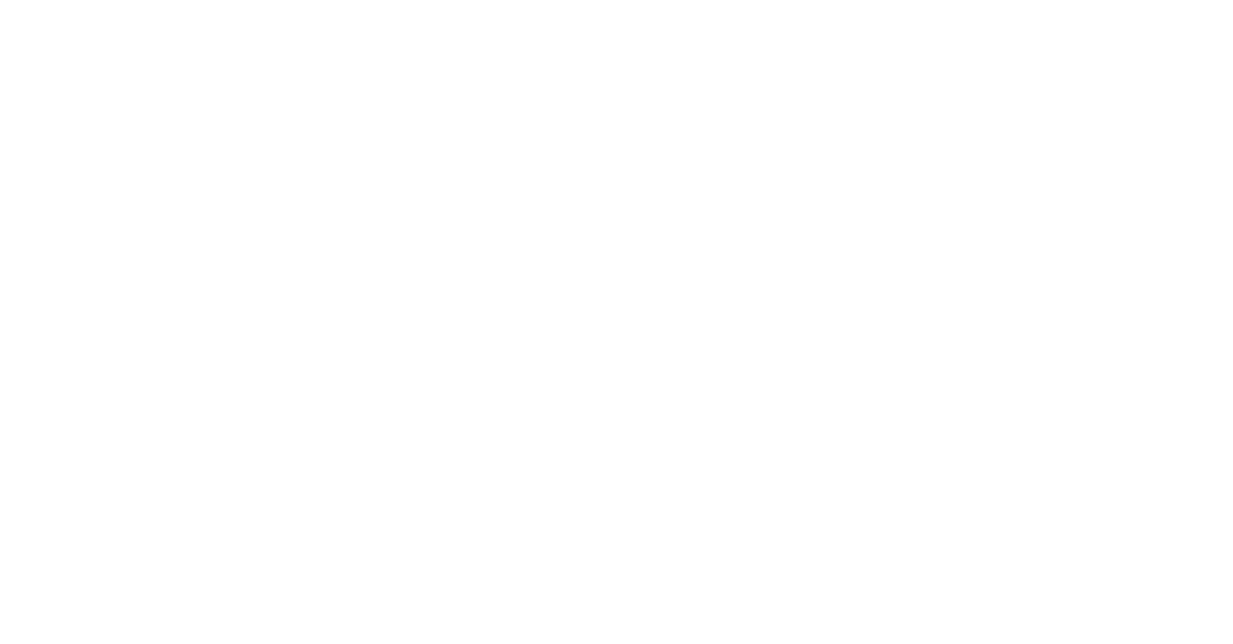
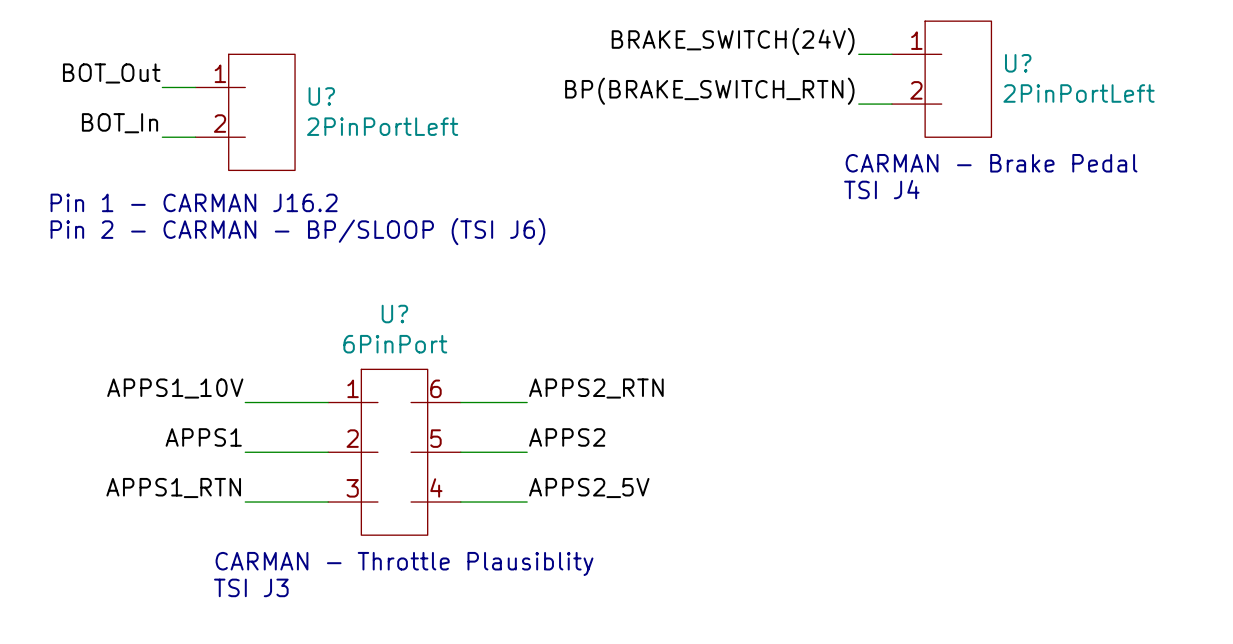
label: none -> BRAKE_SWITCH(24V) (733, 41)
wire: none -> (858, 54) (891, 54)
label: none -> BOT_Out (111, 73)
U?: none -> 2PinPortLeft (941, 79)
wire: none -> (162, 87) (195, 87)
label: none -> BP(BRAKE_SWITCH_RTN) (709, 91)
wire: none -> (858, 104) (891, 104)
U?: none -> 2PinPortLeft (245, 112)
label: none -> BOT_In (120, 123)
wire: none -> (162, 137) (195, 137)
text: none -> CARMAN - Brake Pedal (991, 163)
text: none -> TSI J4 (881, 189)
text: none -> Pin 1 - CARMAN J16.2 (194, 202)
text: none -> Pin 2 - CARMAN - BP/SLOOP (TSI J6) (297, 231)
label: none -> APPS1_10V (175, 388)
label: none -> APPS2_RTN (596, 388)
wire: none -> (245, 402) (328, 402)
wire: none -> (460, 402) (527, 402)
label: none -> APPS1 (203, 437)
label: none -> APPS2 (567, 437)
wire: none -> (245, 452) (328, 452)
U?: none -> 6PinPort (394, 452)
wire: none -> (460, 452) (527, 452)
label: none -> APPS1_RTN (173, 488)
label: none -> APPS2_5V (589, 488)
wire: none -> (245, 502) (328, 502)
wire: none -> (460, 502) (527, 502)
text: none -> CARMAN - Throttle Plausiblity (404, 563)
text: none -> TSI J3 (251, 587)

